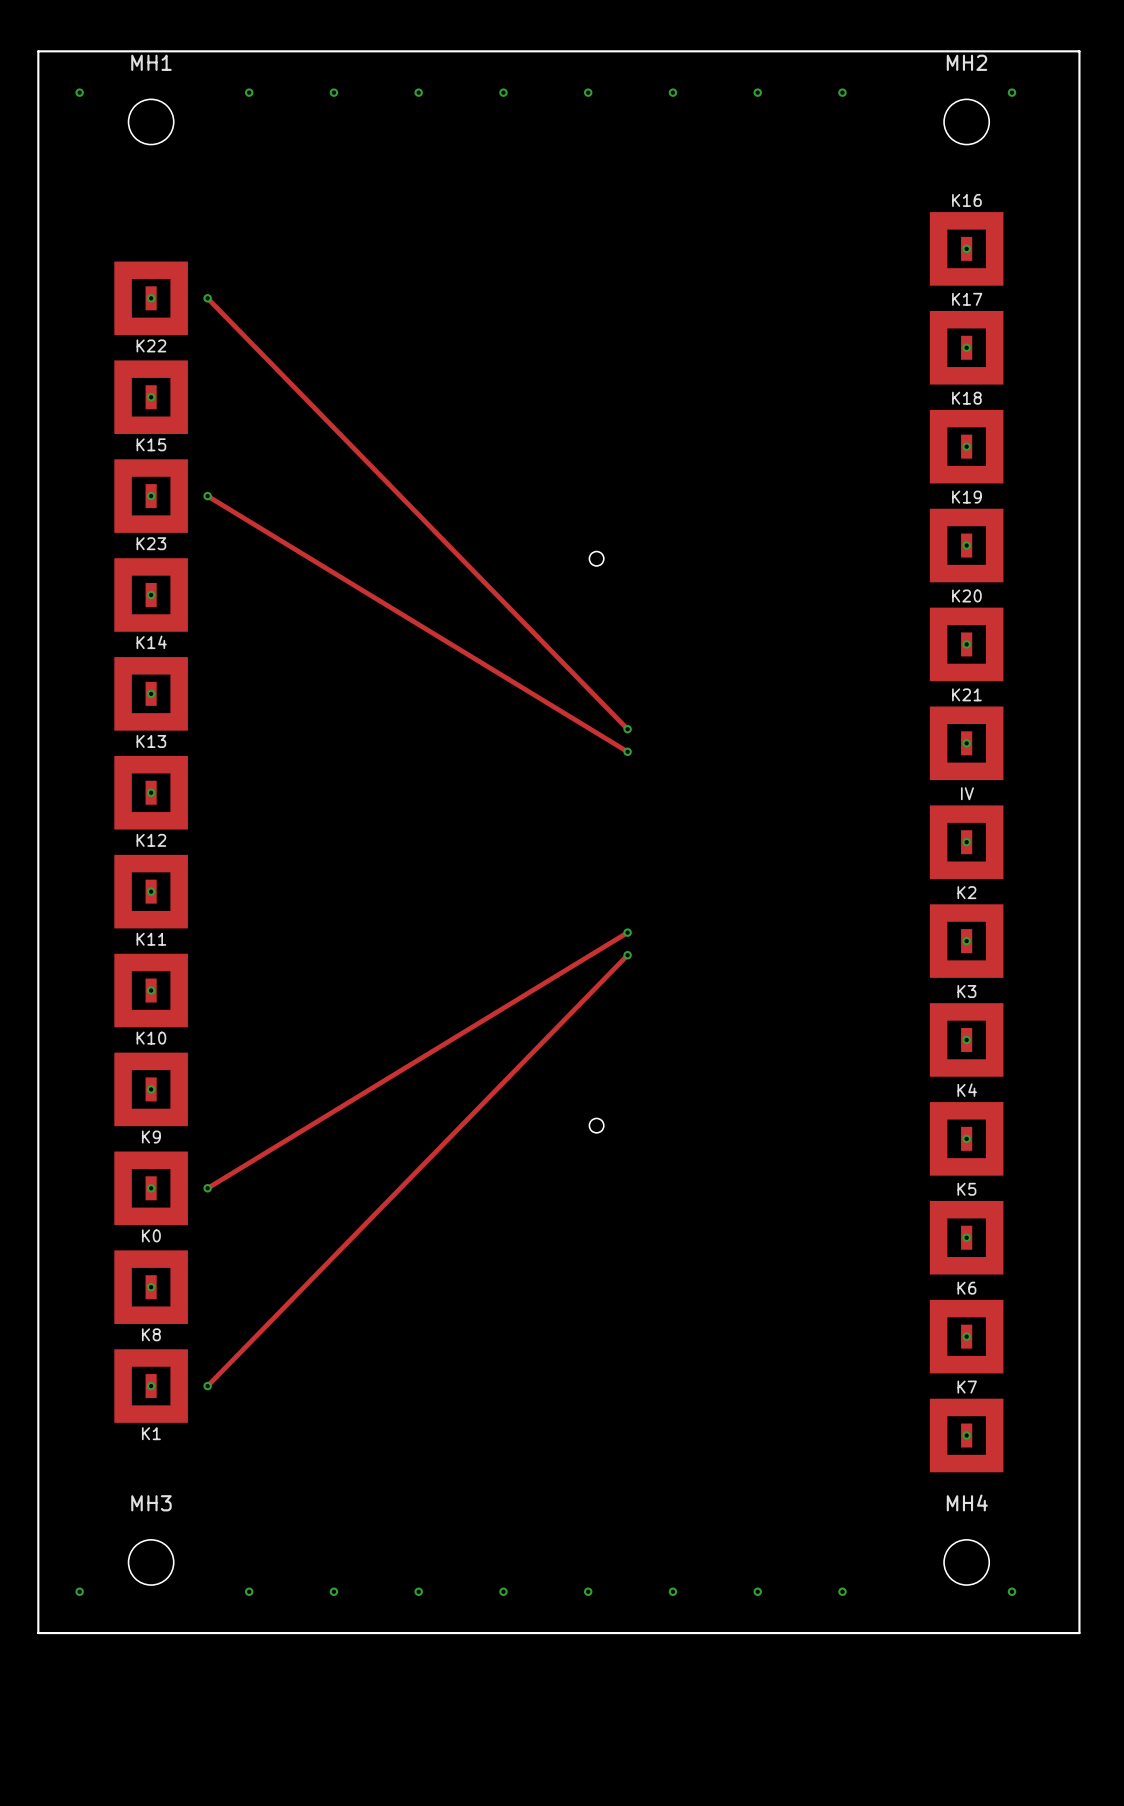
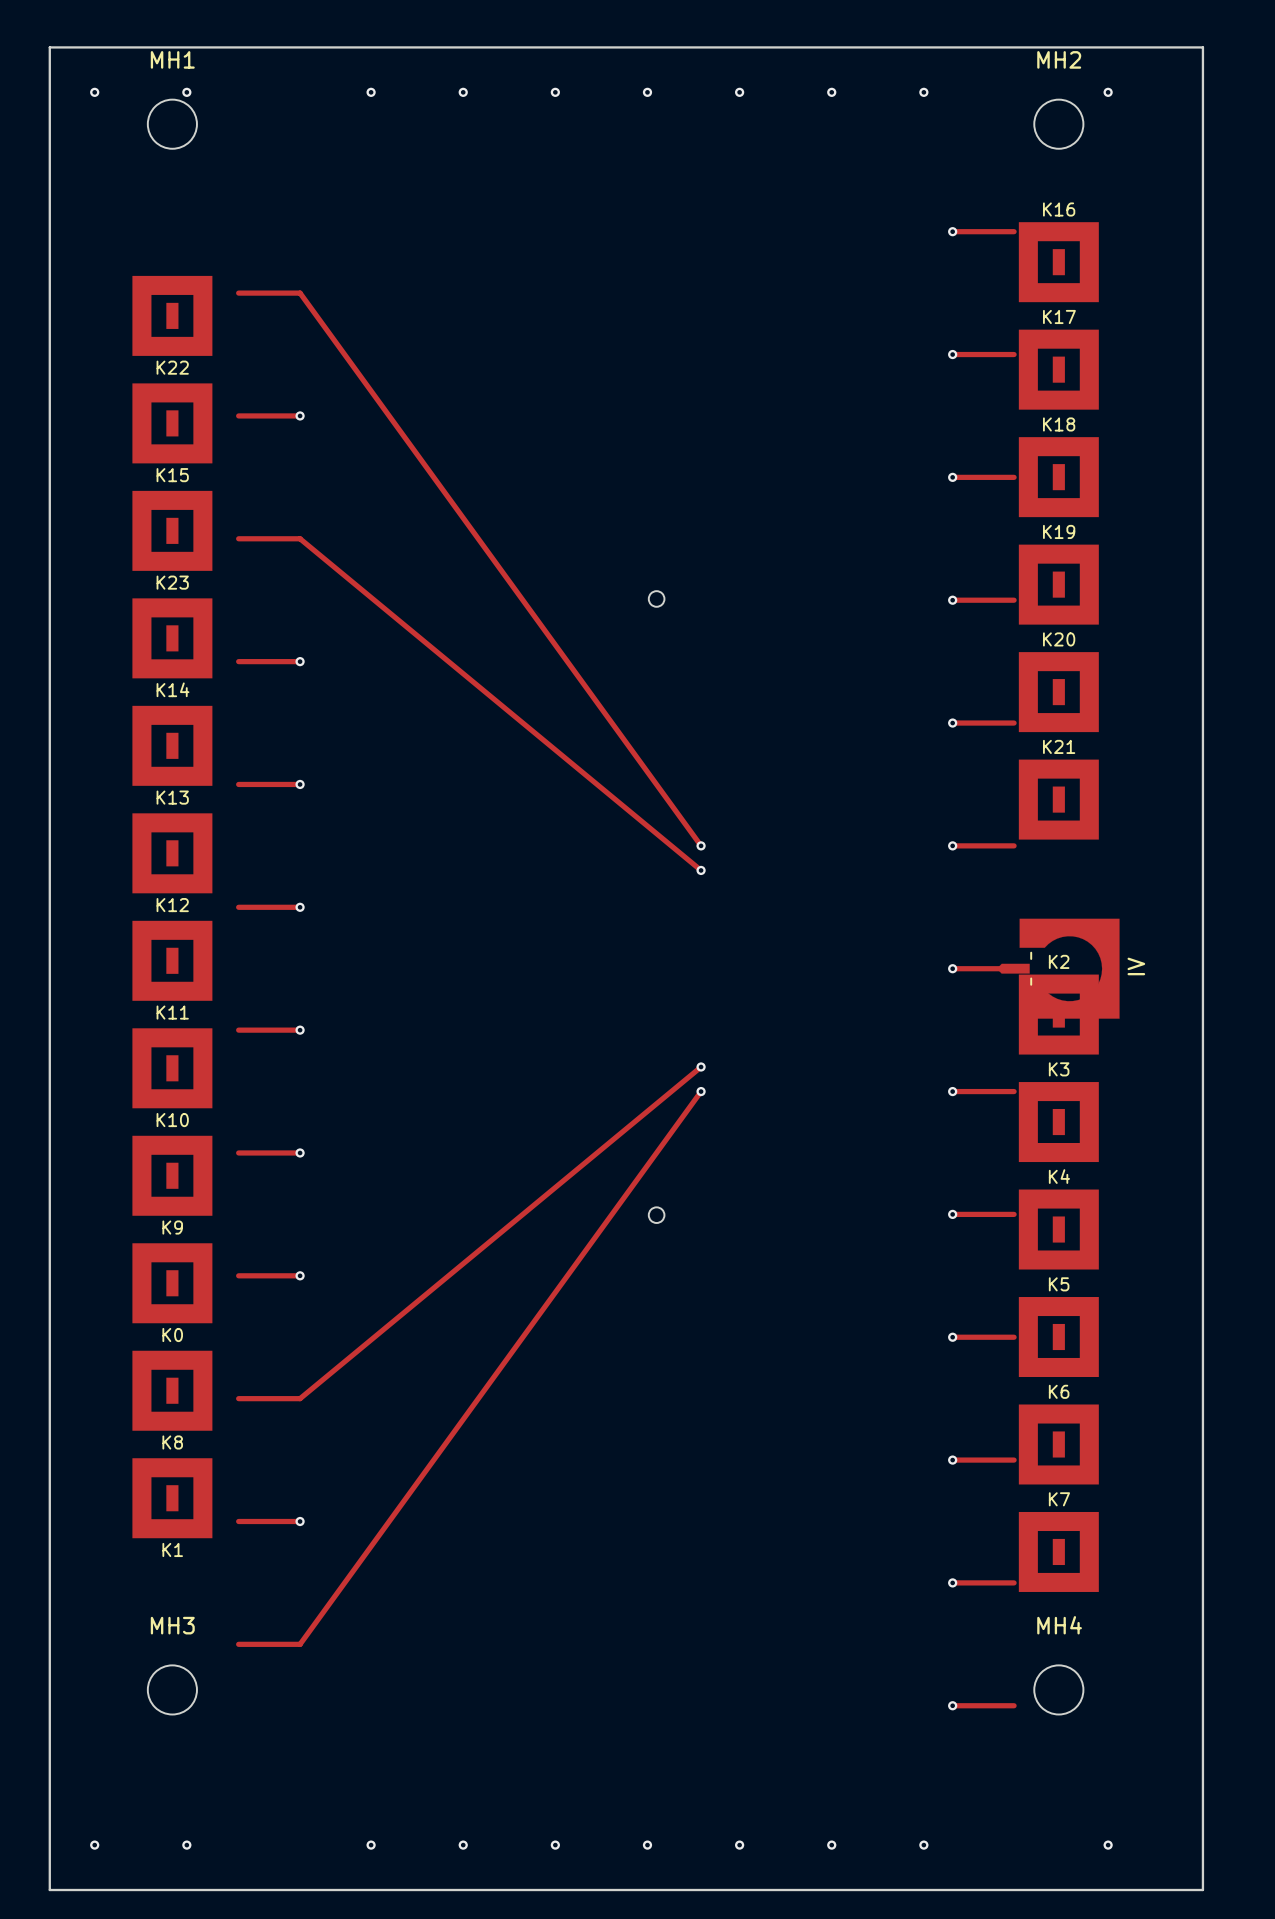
board edge: (1079, 51) (1079, 1633) (38, 1633) -> (1181, 47) (1202, 47) (1202, 1890) (49, 1890) (49, 1766)
via position: (249, 92) -> (186, 92)
track: none -> (952, 231) (1014, 231)
via: none -> (952, 231)
via: (966, 248) -> none
track: none -> (238, 293) (300, 293) (701, 845)
via: (151, 298) -> none
track: (207, 298) (627, 729) -> none
via: (207, 298) -> none
track: none -> (952, 354) (1014, 354)
via: none -> (952, 354)
via: (966, 347) -> none
track: none -> (238, 415) (300, 415)
via: none -> (300, 415)
via: (151, 397) -> none
track: none -> (952, 477) (1014, 477)
via: none -> (952, 477)
via: (966, 446) -> none
via: (151, 496) -> none
track: (207, 496) (627, 751) -> none
via: (207, 496) -> none
track: none -> (238, 538) (300, 538) (701, 870)
via: (966, 545) -> none
track: none -> (952, 600) (1014, 600)
via: none -> (952, 600)
via: (151, 594) -> none
track: none -> (238, 661) (300, 661)
via: none -> (300, 661)
via: (966, 644) -> none
track: none -> (952, 723) (1014, 723)
via: none -> (952, 723)
via: (151, 693) -> none
track: none -> (238, 784) (300, 784)
via: none -> (300, 784)
via: (627, 729) -> none
via: (966, 743) -> none
via: (627, 751) -> none
via: none -> (701, 845)
track: none -> (952, 845) (1014, 845)
via: none -> (952, 845)
via: (151, 792) -> none
via: none -> (701, 870)
track: none -> (238, 907) (300, 907)
via: none -> (300, 907)
IV: (966, 842) -> none
via: (966, 842) -> none
via: (151, 891) -> none
track: none -> (952, 968) (1014, 968)
via: none -> (952, 968)
IV: none -> (1055, 968)
track: (627, 932) (207, 1188) -> none
via: (627, 932) -> none
via: (966, 941) -> none
track: none -> (238, 1030) (300, 1030)
via: none -> (300, 1030)
track: (627, 955) (207, 1386) -> none
via: (627, 955) -> none
track: none -> (701, 1066) (300, 1398) (238, 1398)
via: none -> (701, 1066)
via: (151, 990) -> none
track: none -> (701, 1091) (300, 1644) (238, 1644)
via: none -> (701, 1091)
track: none -> (952, 1091) (1014, 1091)
via: none -> (952, 1091)
via: (966, 1039) -> none
track: none -> (238, 1152) (300, 1152)
via: none -> (300, 1152)
via: (151, 1089) -> none
track: none -> (952, 1214) (1014, 1214)
via: none -> (952, 1214)
via: (966, 1138) -> none
track: none -> (238, 1275) (300, 1275)
via: none -> (300, 1275)
via: (151, 1188) -> none
via: (207, 1188) -> none
track: none -> (952, 1337) (1014, 1337)
via: none -> (952, 1337)
via: (966, 1237) -> none
via: (151, 1287) -> none
via: (966, 1336) -> none
track: none -> (952, 1460) (1014, 1460)
via: none -> (952, 1460)
via: (151, 1386) -> none
via: (207, 1386) -> none
track: none -> (238, 1521) (300, 1521)
via: none -> (300, 1521)
via: (966, 1435) -> none
track: none -> (952, 1582) (1014, 1582)
via: none -> (952, 1582)
track: none -> (952, 1705) (1014, 1705)
via: (79, 1591) -> none
via: (249, 1591) -> none
via: (333, 1591) -> none
via: (418, 1591) -> none
via: (503, 1591) -> none
via: (588, 1591) -> none
via: (672, 1591) -> none
via: (757, 1591) -> none
via position: (842, 1591) -> (952, 1705)
via: (1012, 1591) -> none
via: none -> (94, 1845)
via: none -> (186, 1845)
via: none -> (371, 1845)
via: none -> (463, 1845)
via: none -> (555, 1845)
via: none -> (647, 1845)
via: none -> (739, 1845)
via: none -> (831, 1845)
via: none -> (923, 1845)
via: none -> (1108, 1845)

